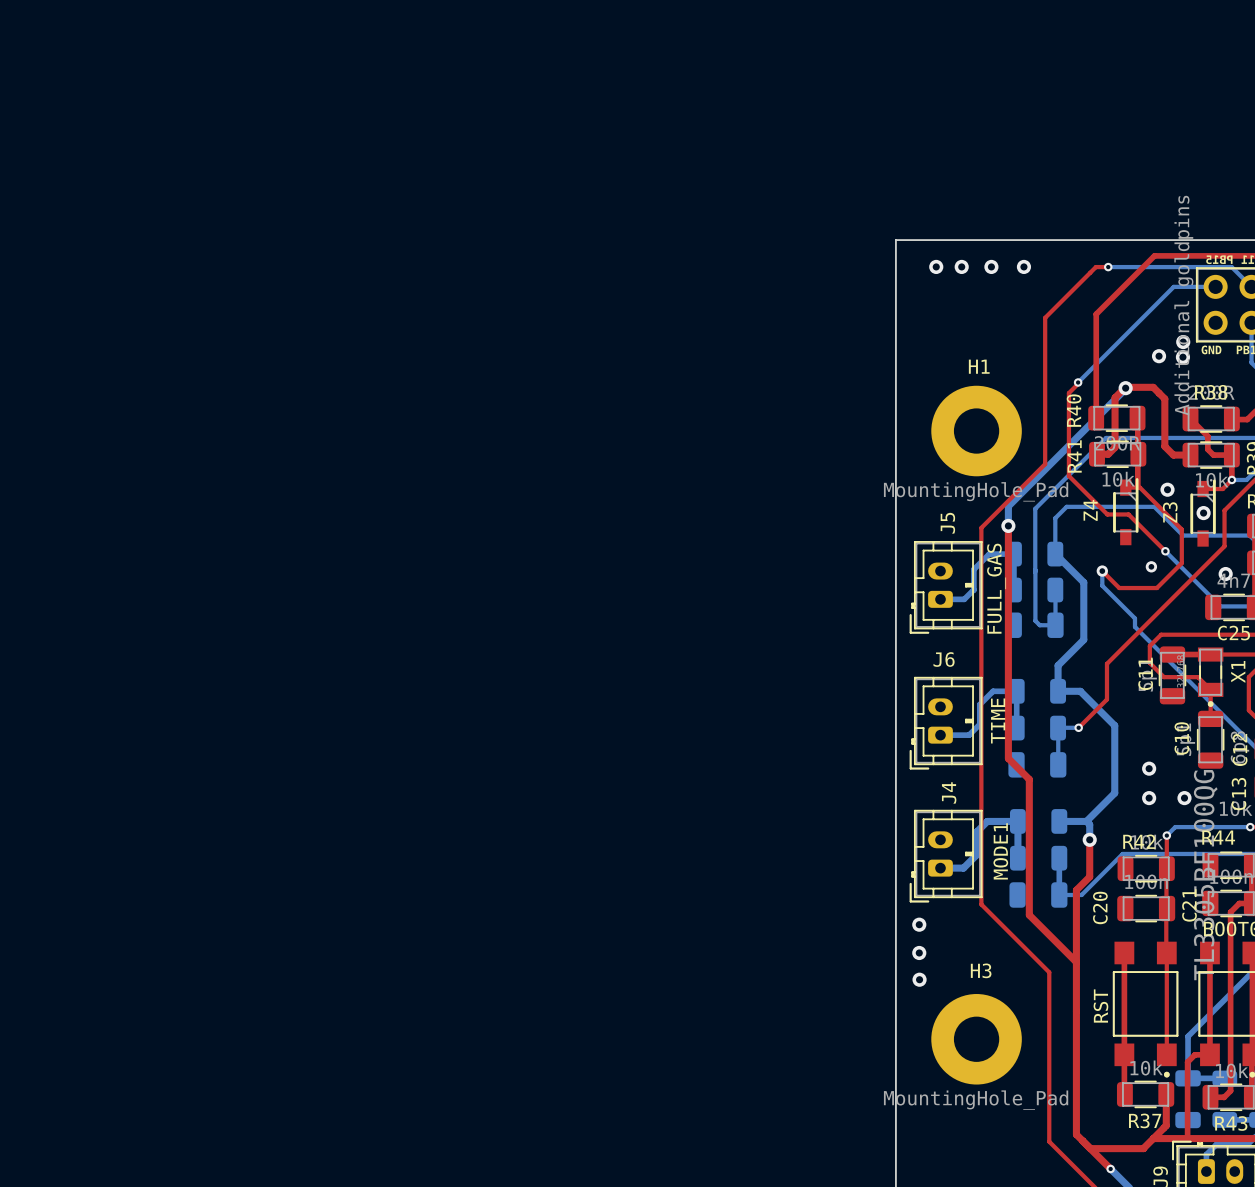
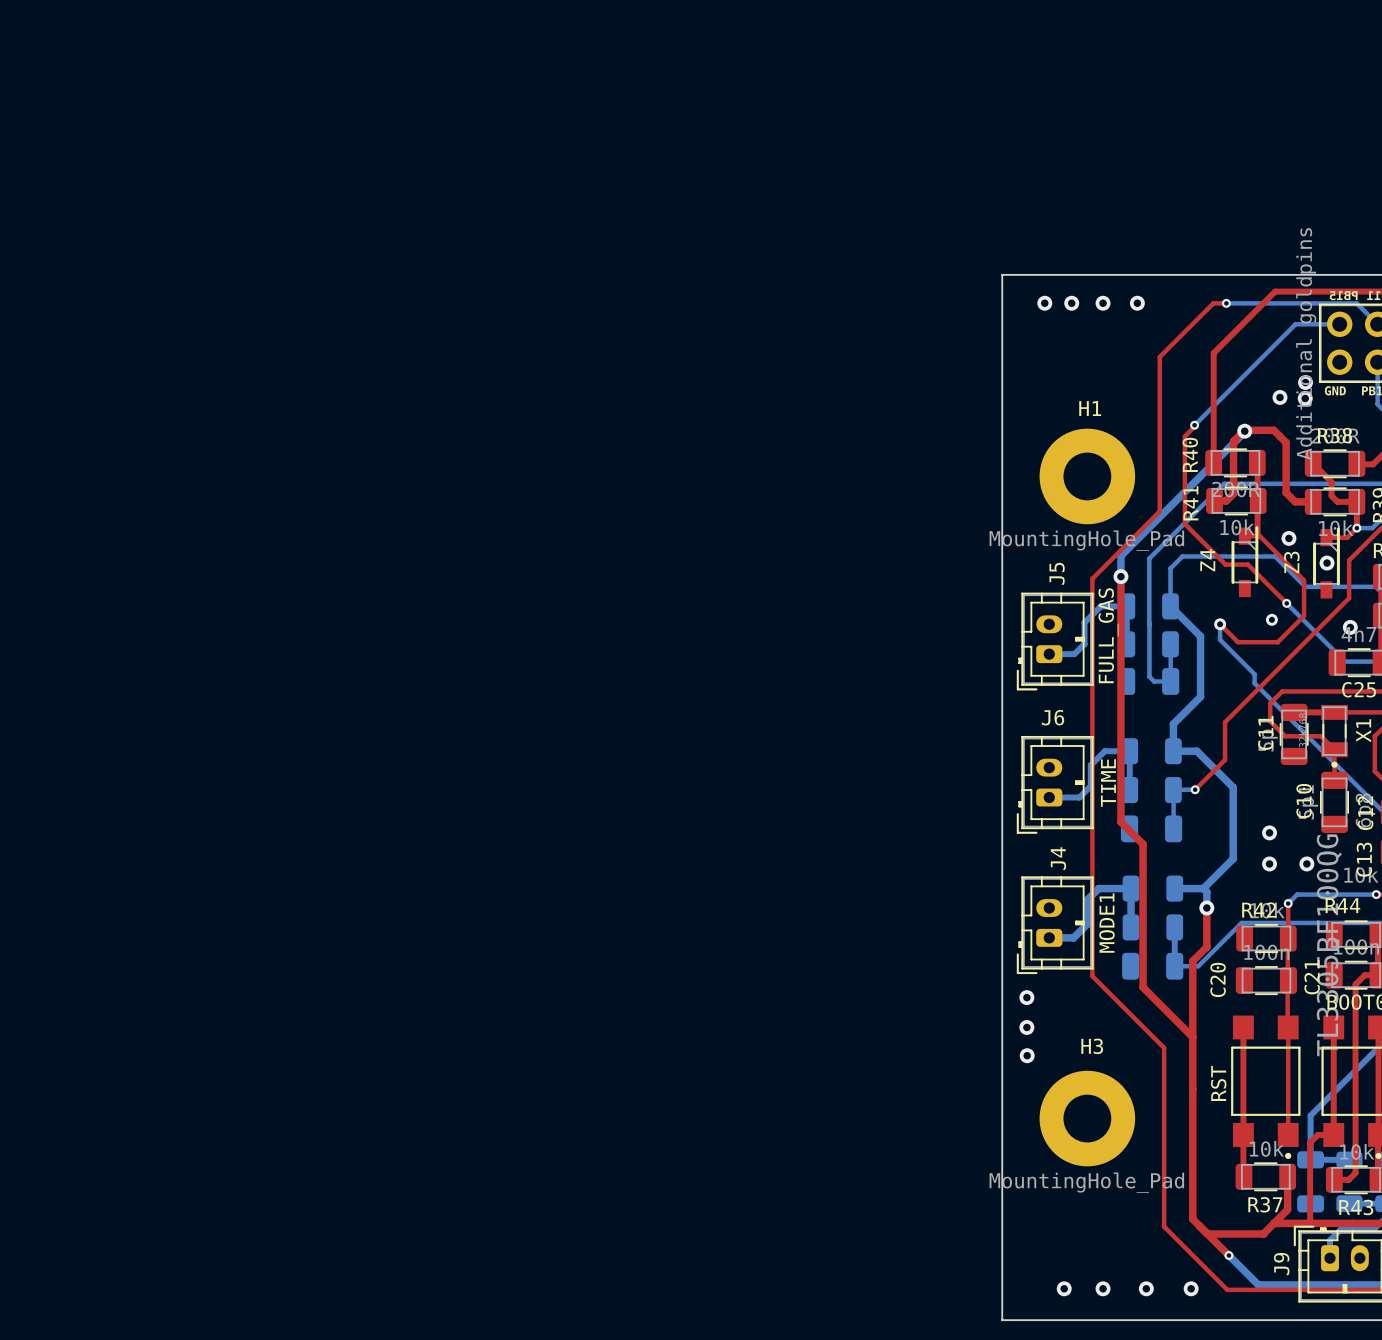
J5 value: none -> FULL_GAS (1108, 635)
text: FULL_GAS (996, 588) -> none
text: TIME (998, 720) -> none
J6 value: none -> TIME (1108, 783)
text: MODE1 (1000, 851) -> none
J4 value: none -> MODE1 (1106, 923)

